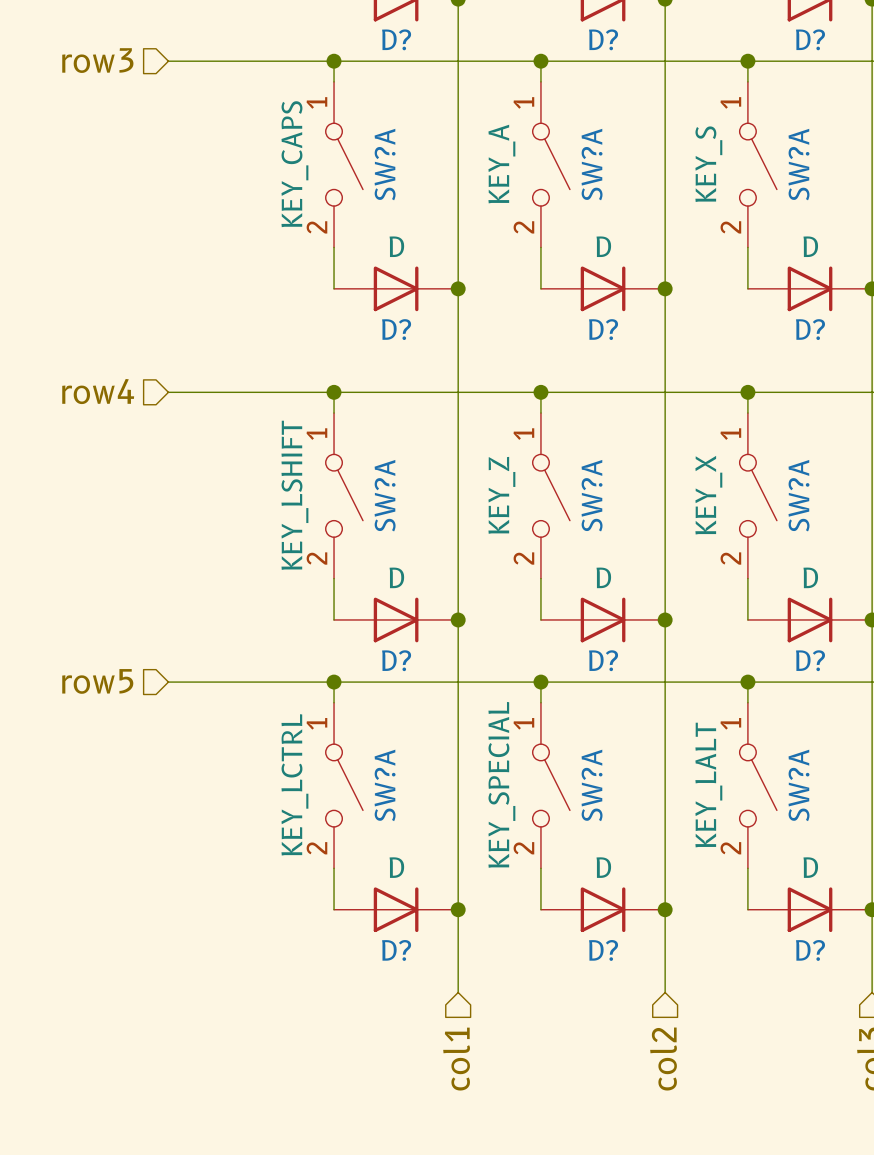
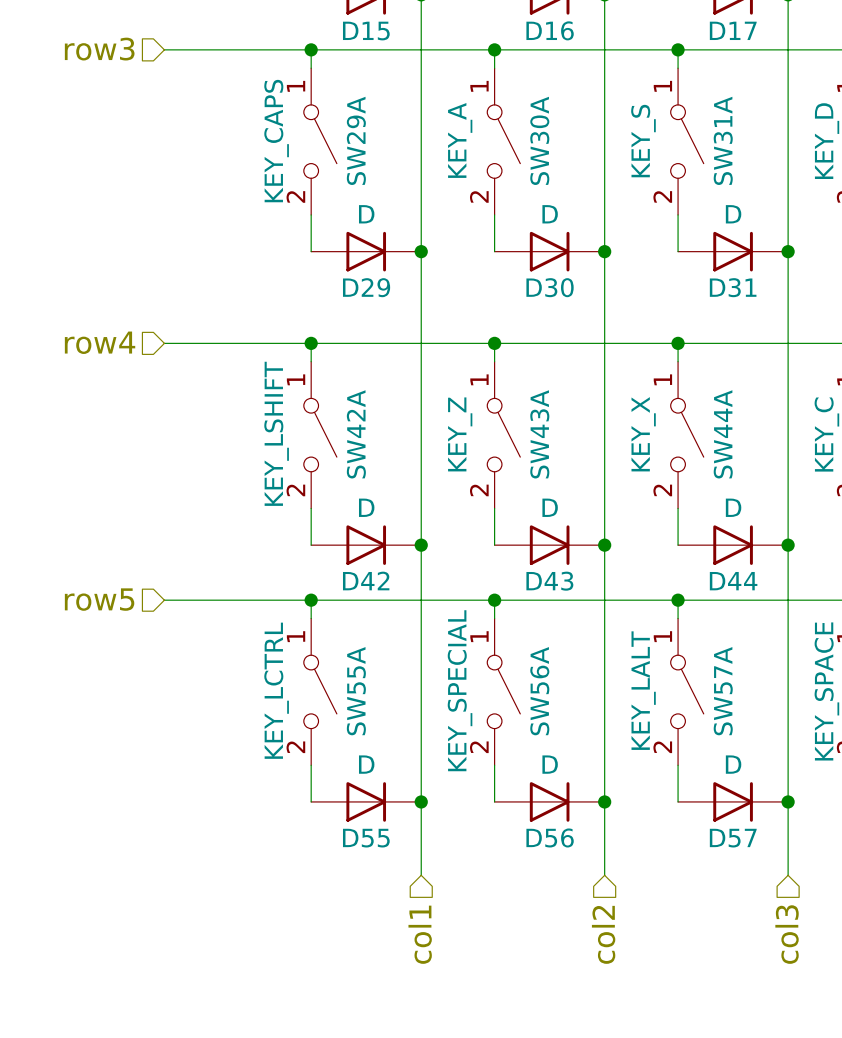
D? name: D? (396, 39) -> D15 (366, 31)
D? name: D? (603, 39) -> D16 (550, 30)
D? name: D? (810, 39) -> D17 (733, 30)
SW?A name: SW?A (385, 164) -> SW29A (356, 140)
SW?A name: SW?A (592, 164) -> SW30A (539, 140)
SW?A name: SW?A (799, 164) -> SW31A (723, 140)
D? name: D? (396, 329) -> D29 (366, 287)
D? name: D? (603, 329) -> D30 (550, 287)
D? name: D? (810, 329) -> D31 (733, 287)
SW?A name: SW?A (385, 495) -> SW42A (356, 434)
SW?A name: SW?A (592, 495) -> SW43A (539, 434)
SW?A name: SW?A (799, 495) -> SW44A (723, 434)
D? name: D? (396, 660) -> D42 (366, 580)
D? name: D? (603, 660) -> D43 (549, 581)
D? name: D? (810, 660) -> D44 (733, 581)
SW?A name: SW?A (385, 785) -> SW55A (356, 691)
SW?A name: SW?A (592, 785) -> SW56A (539, 691)
SW?A name: SW?A (799, 785) -> SW57A (723, 691)
D? name: D? (396, 950) -> D55 (366, 838)
D? name: D? (603, 950) -> D56 (550, 837)
D? name: D? (810, 950) -> D57 (733, 838)

